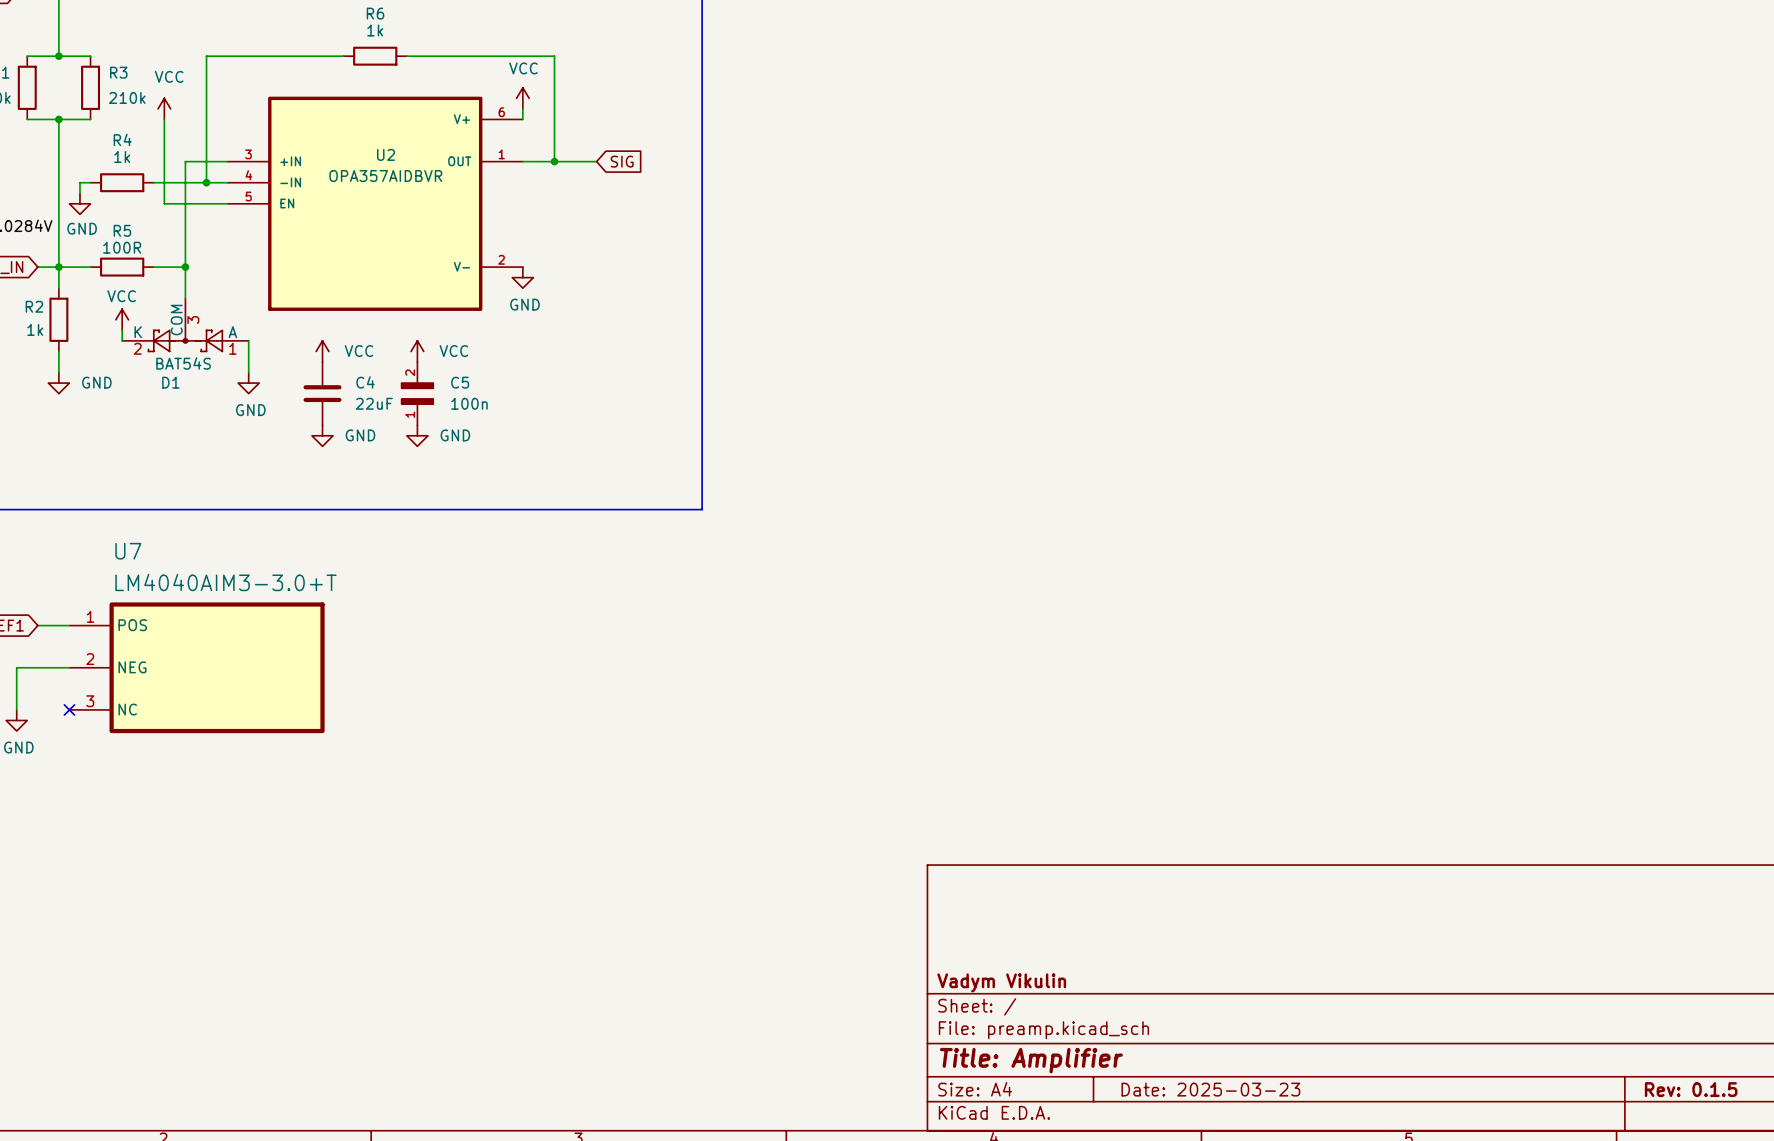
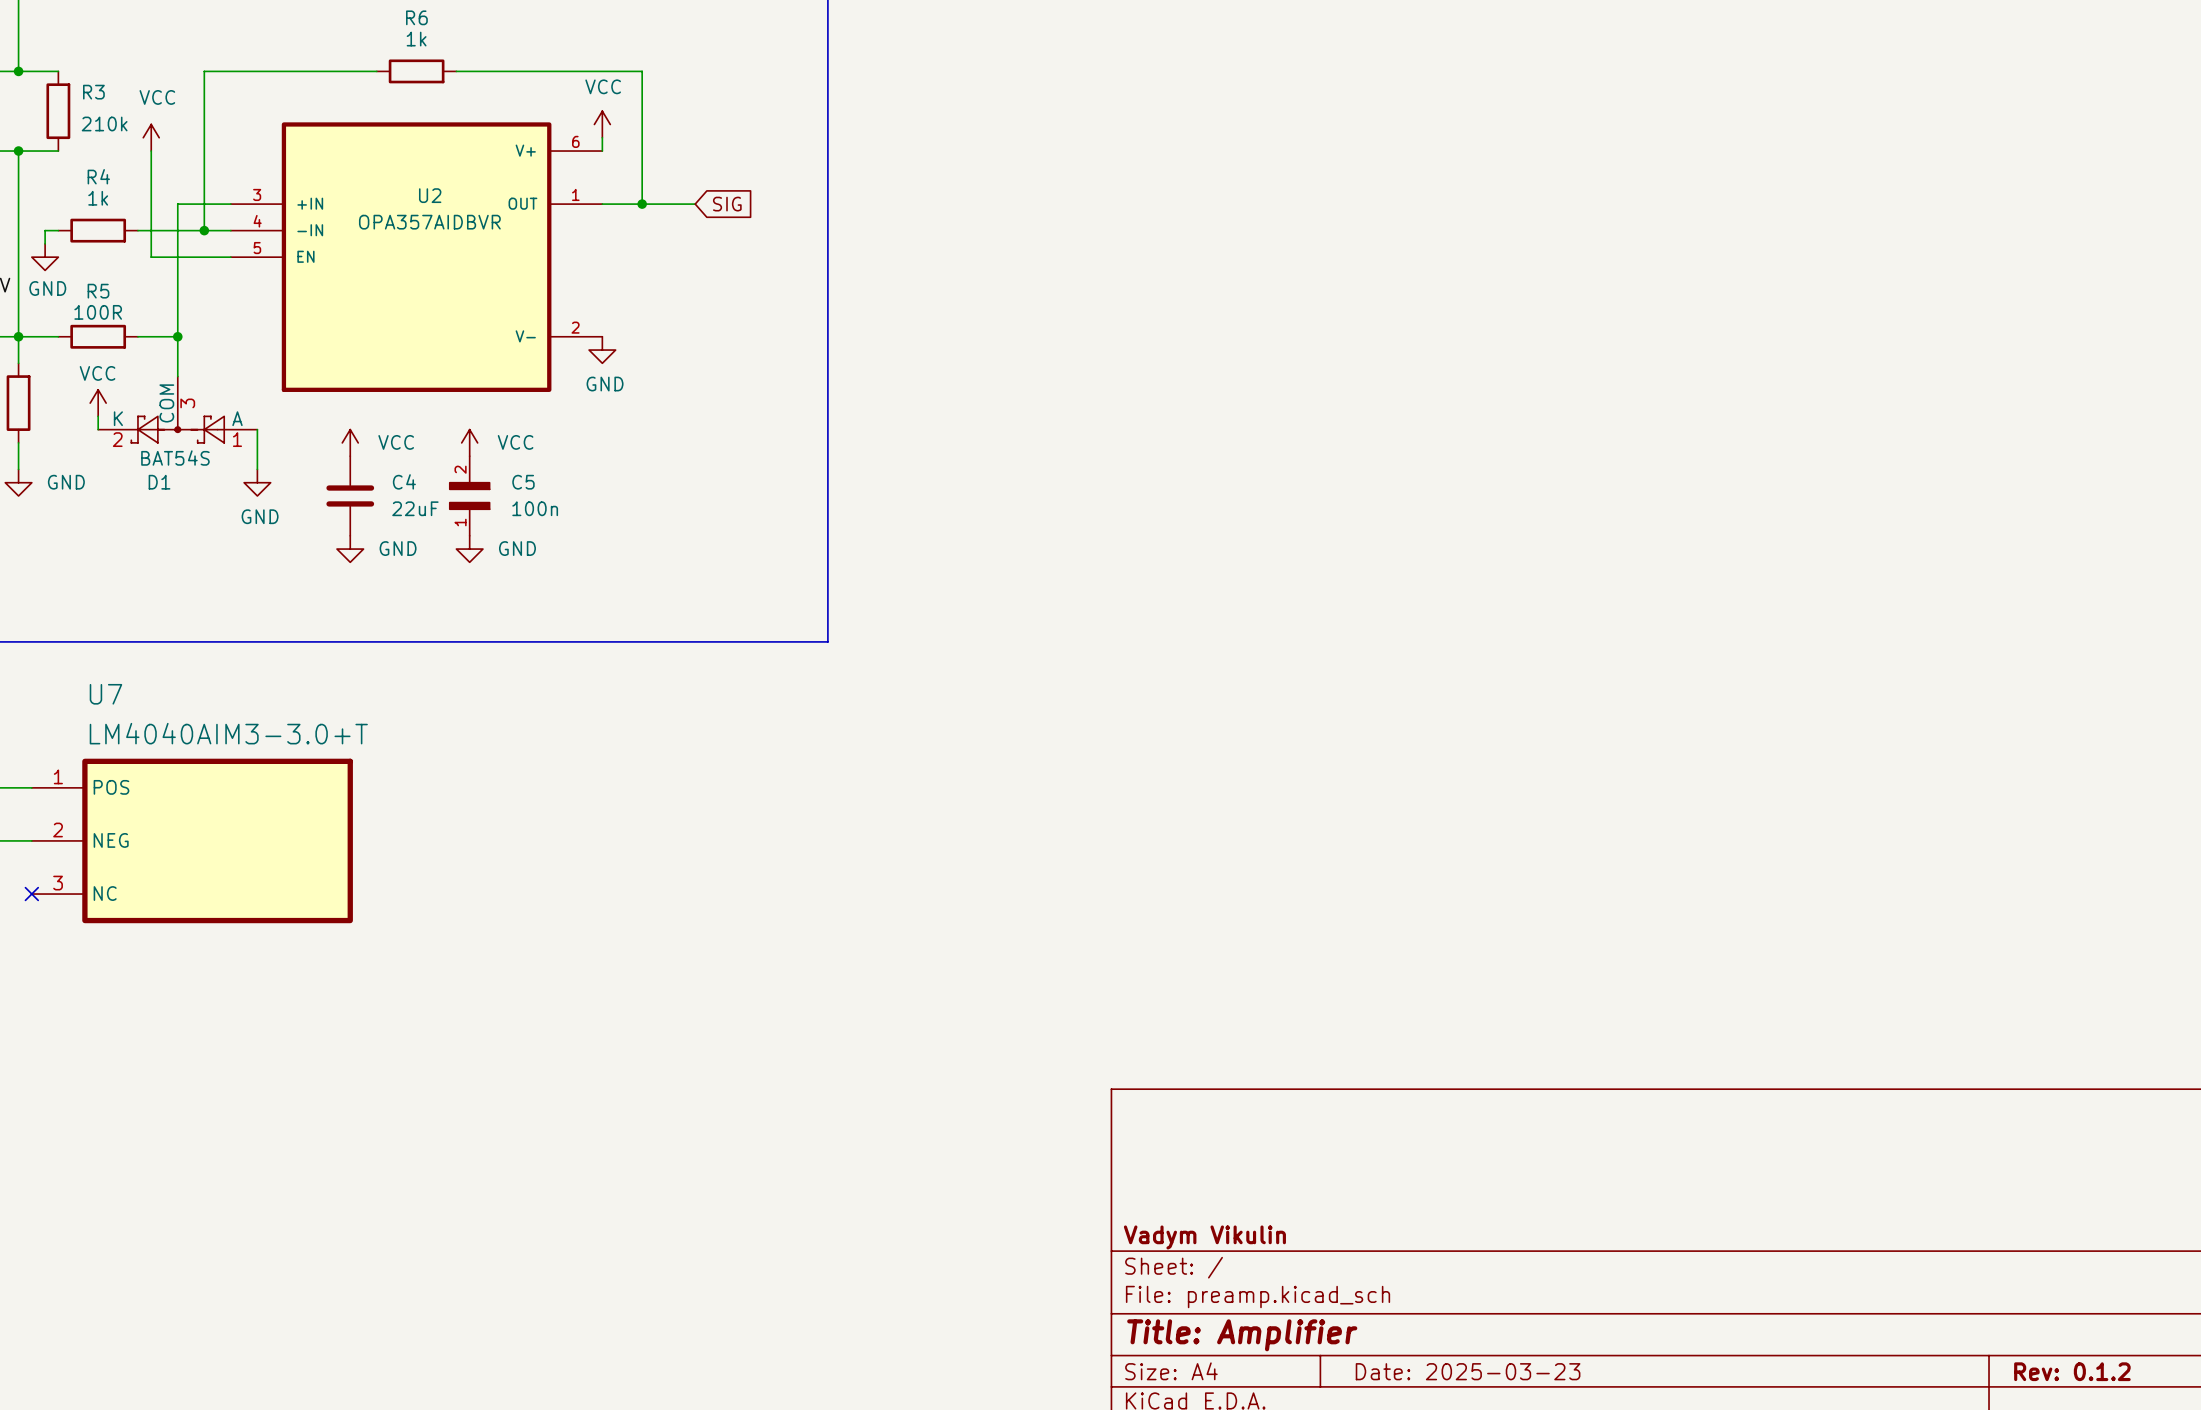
title block: Rev: 0.1.5 (1691, 1089) -> Rev: 0.1.2 (2072, 1371)

